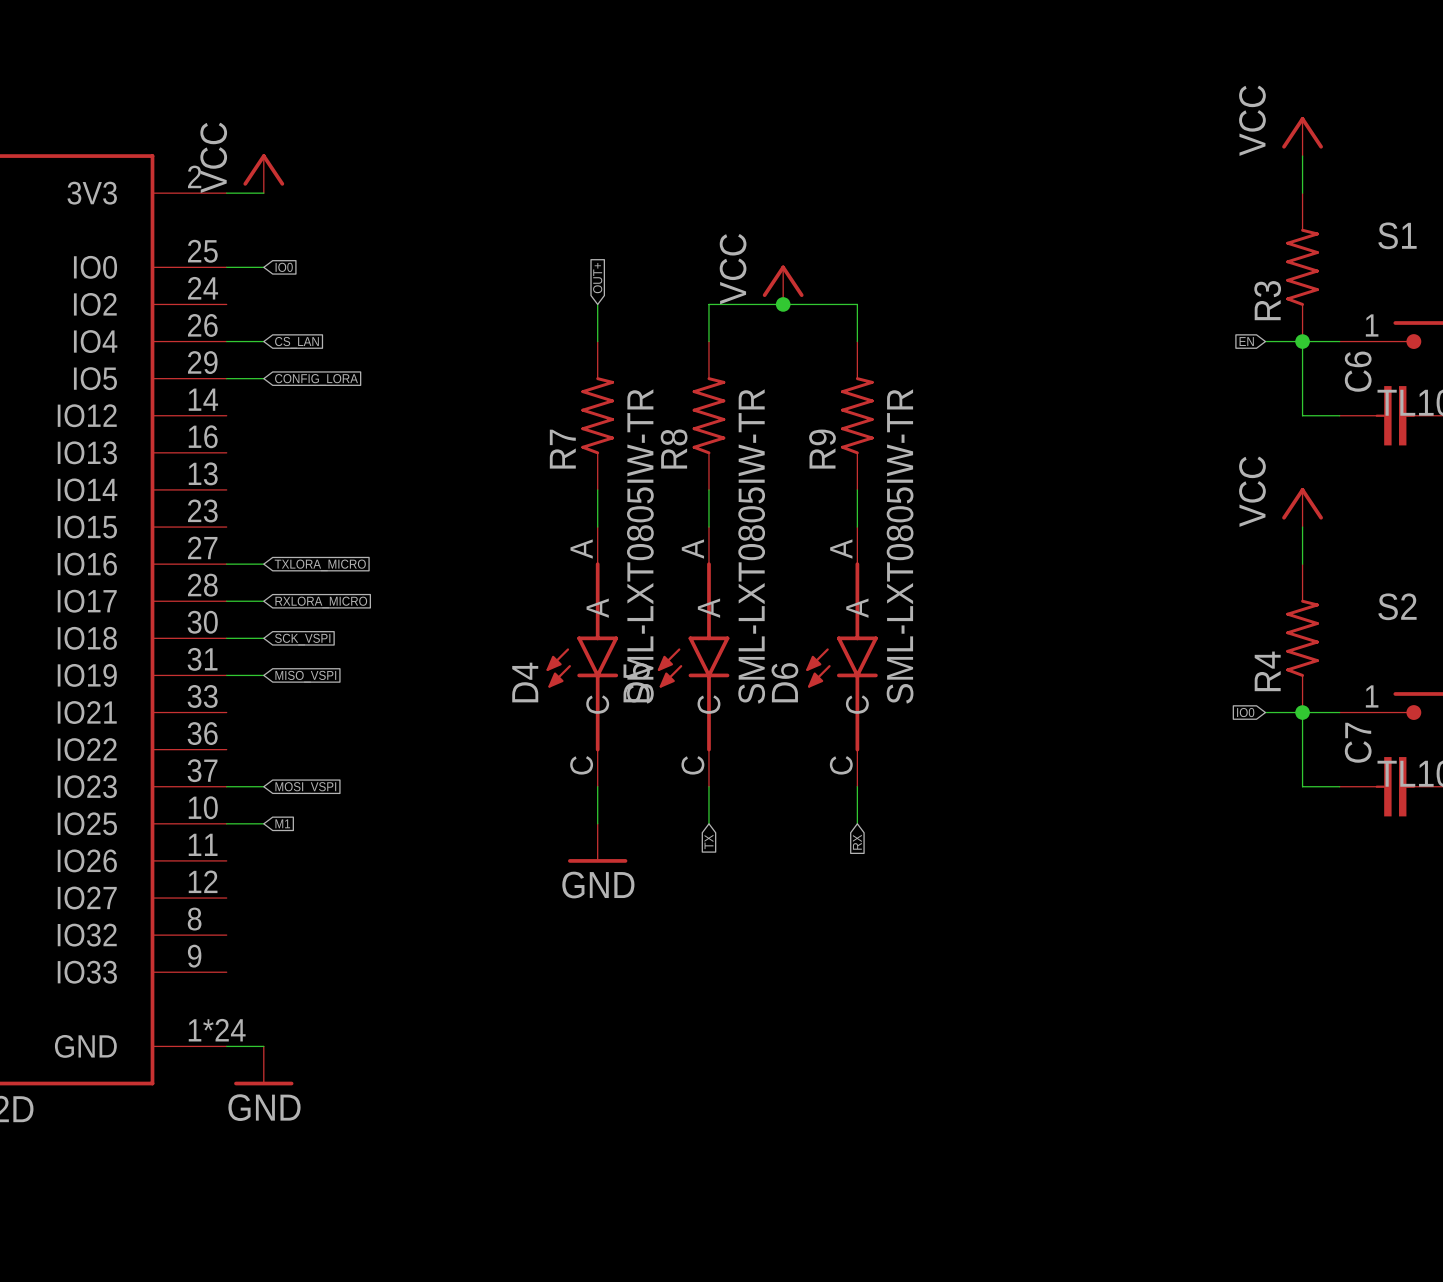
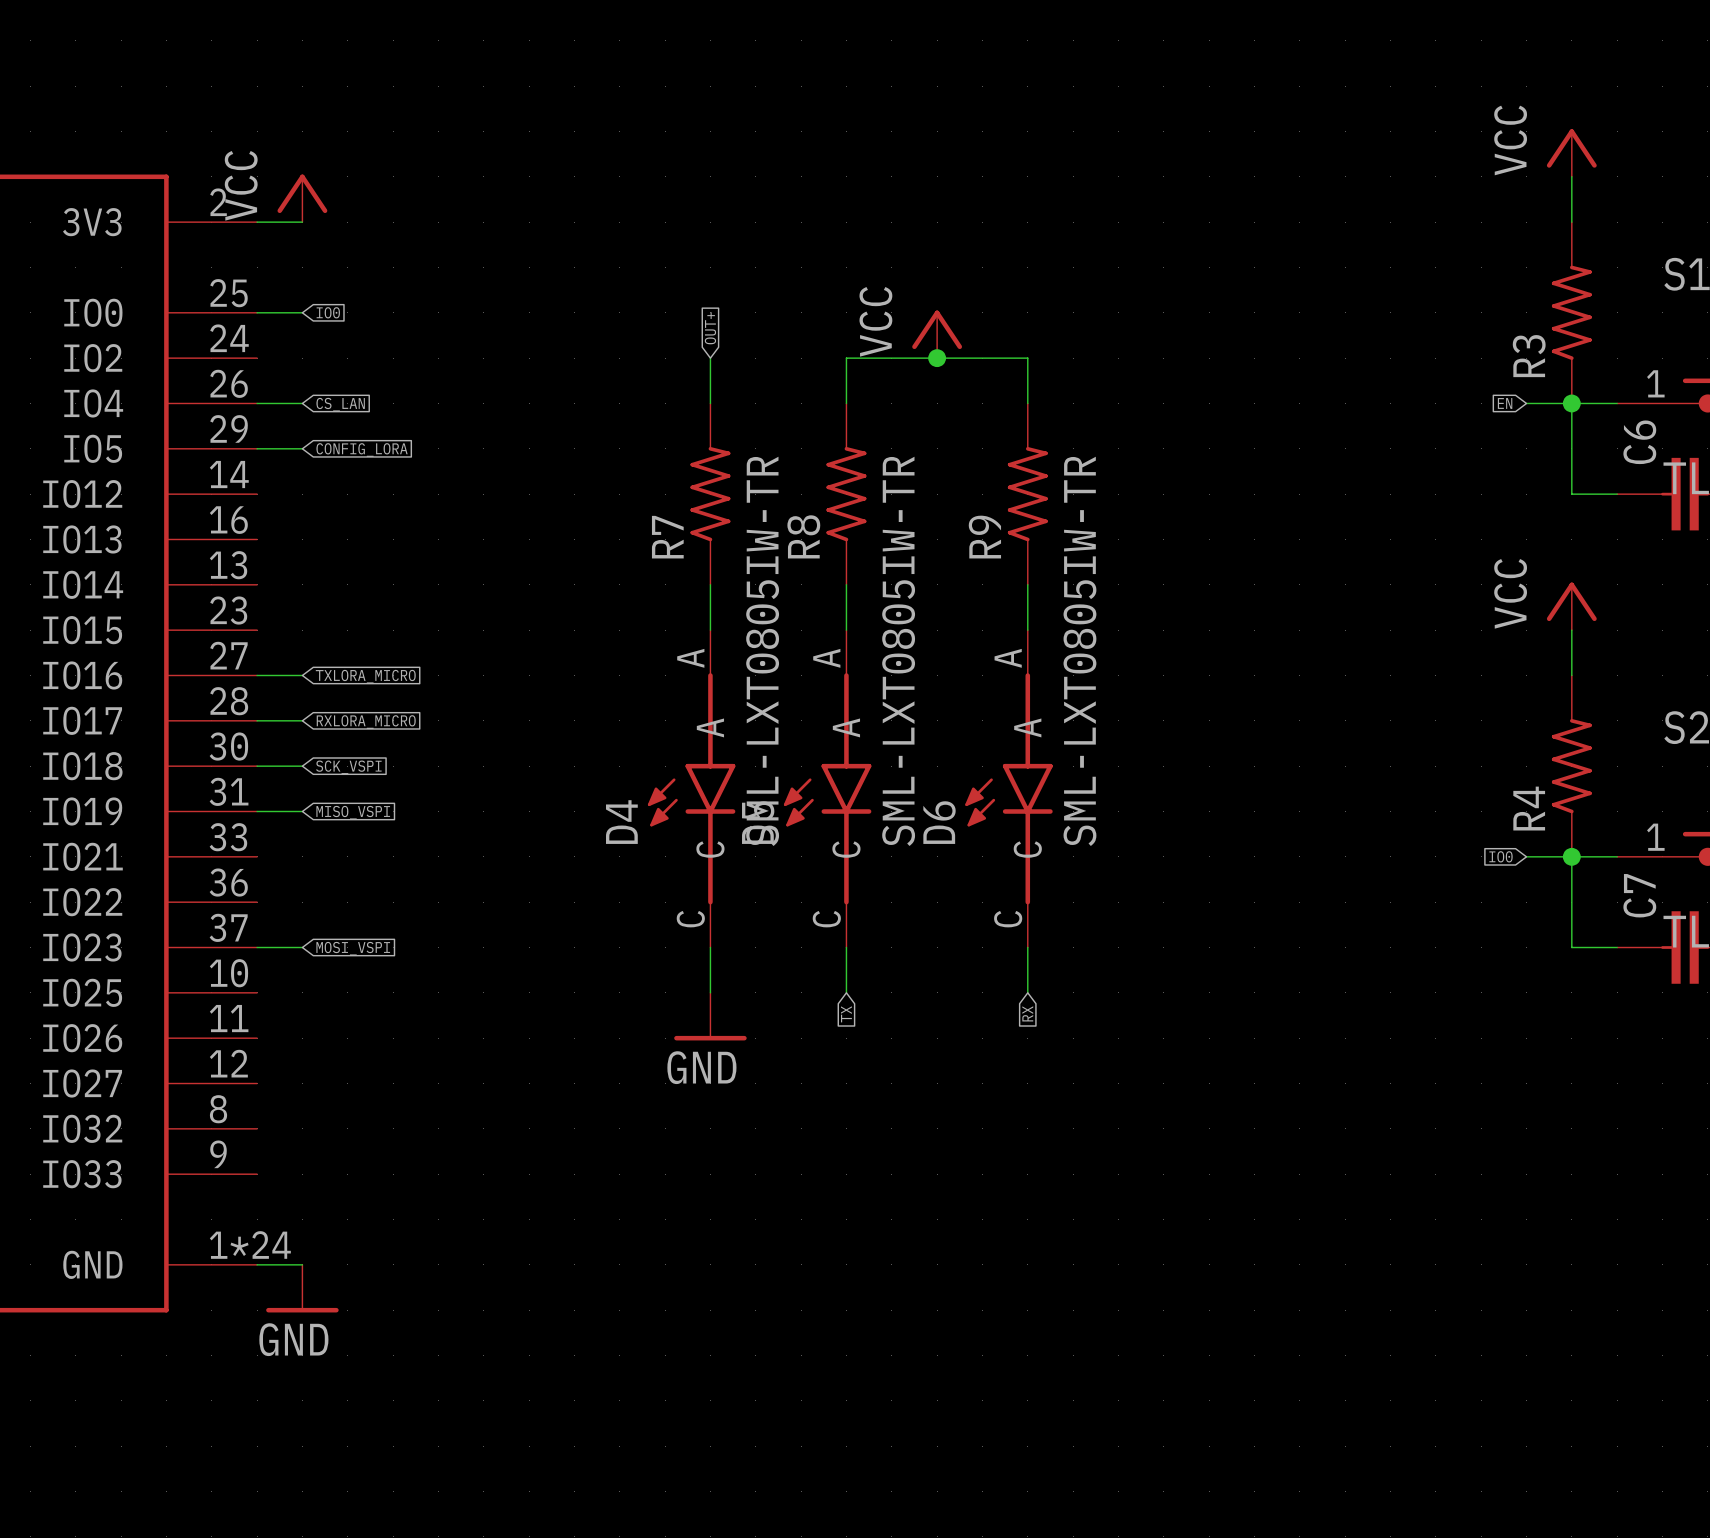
wire: (226, 823) (263, 823) -> none
global label: M1 (282, 823) -> none

